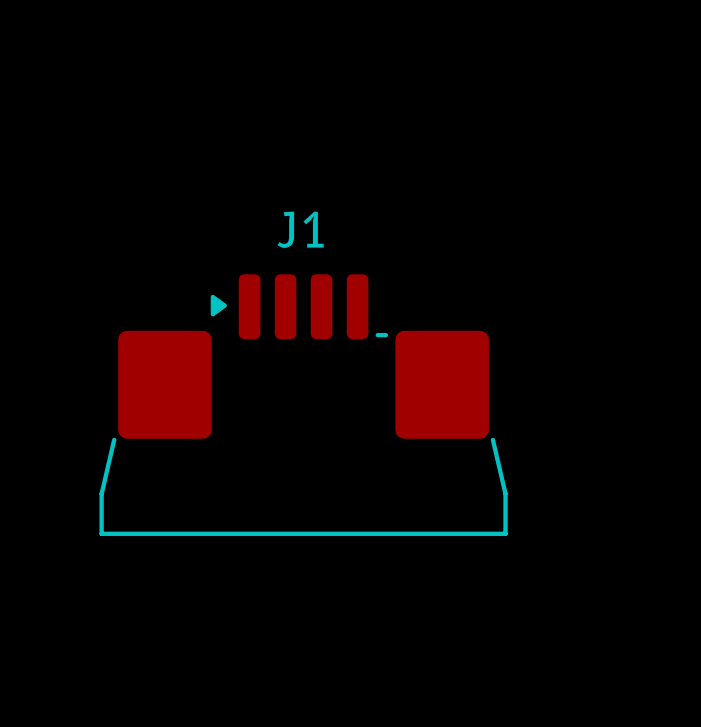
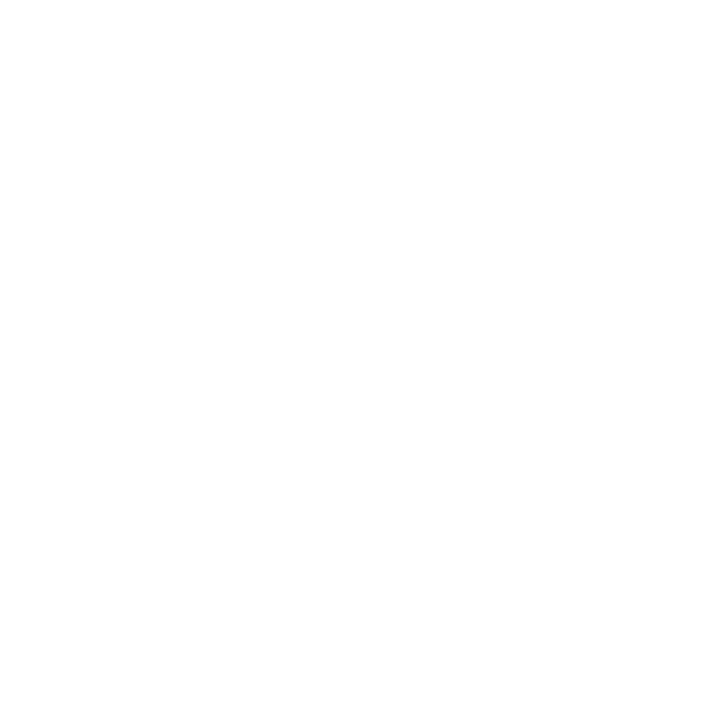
J1: (303, 405) -> none

